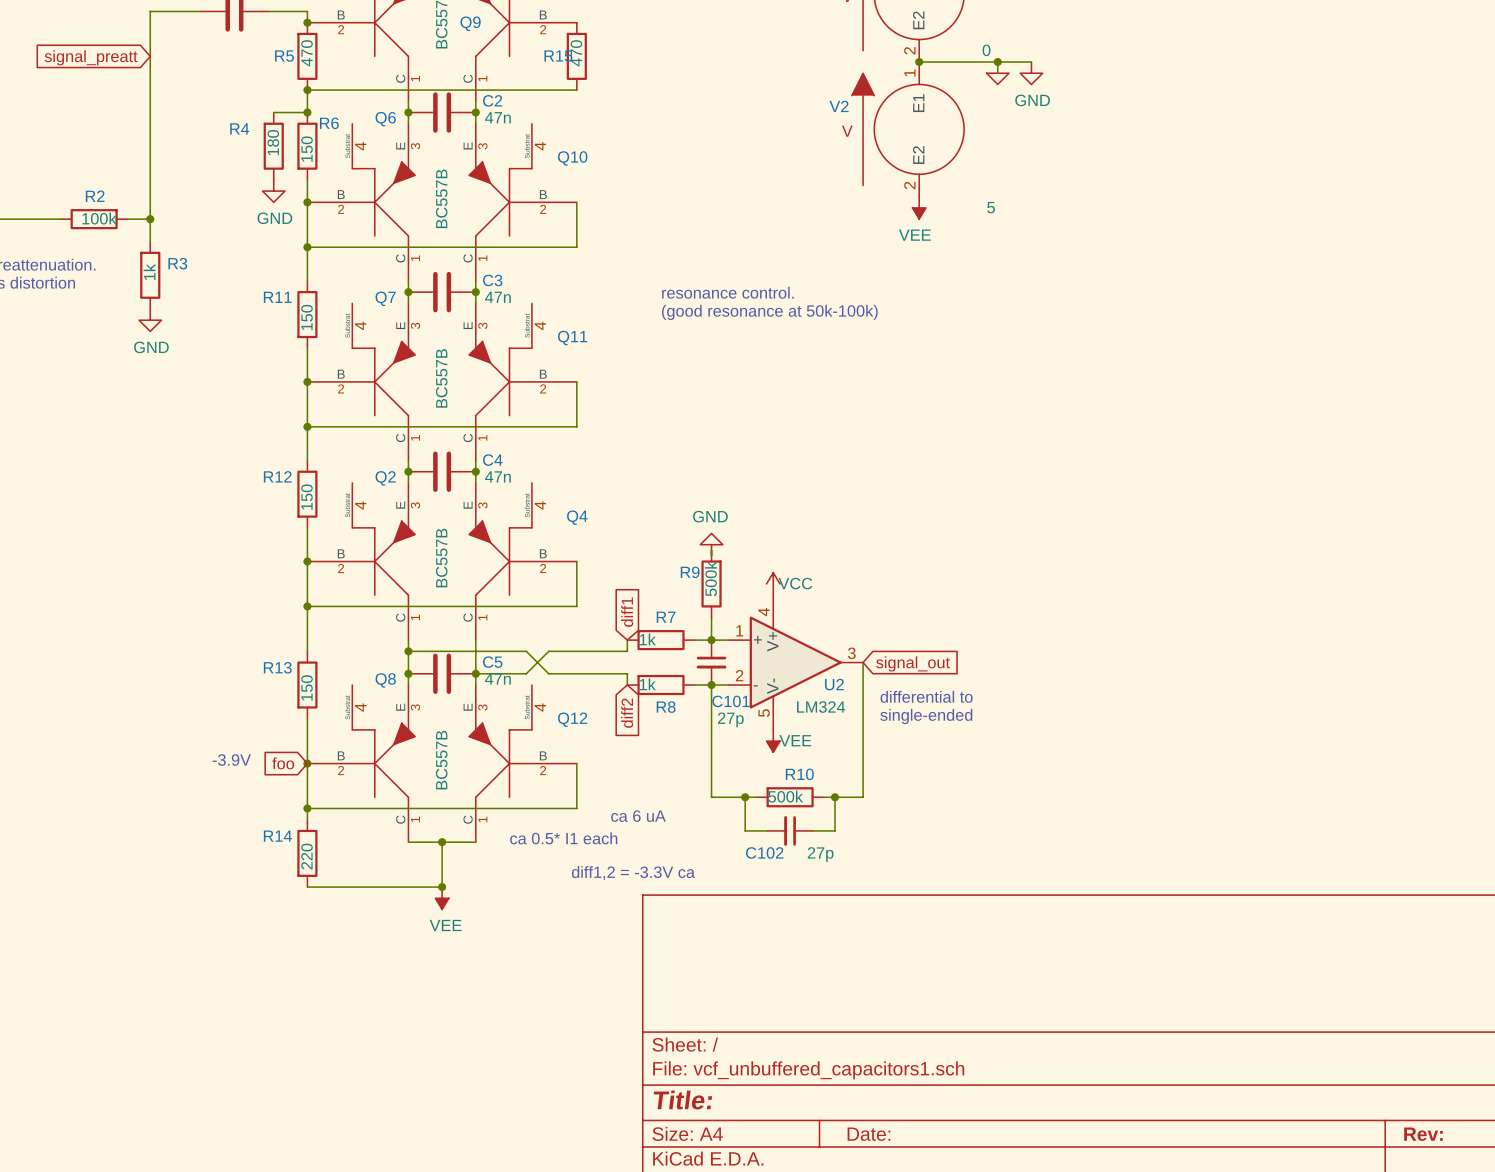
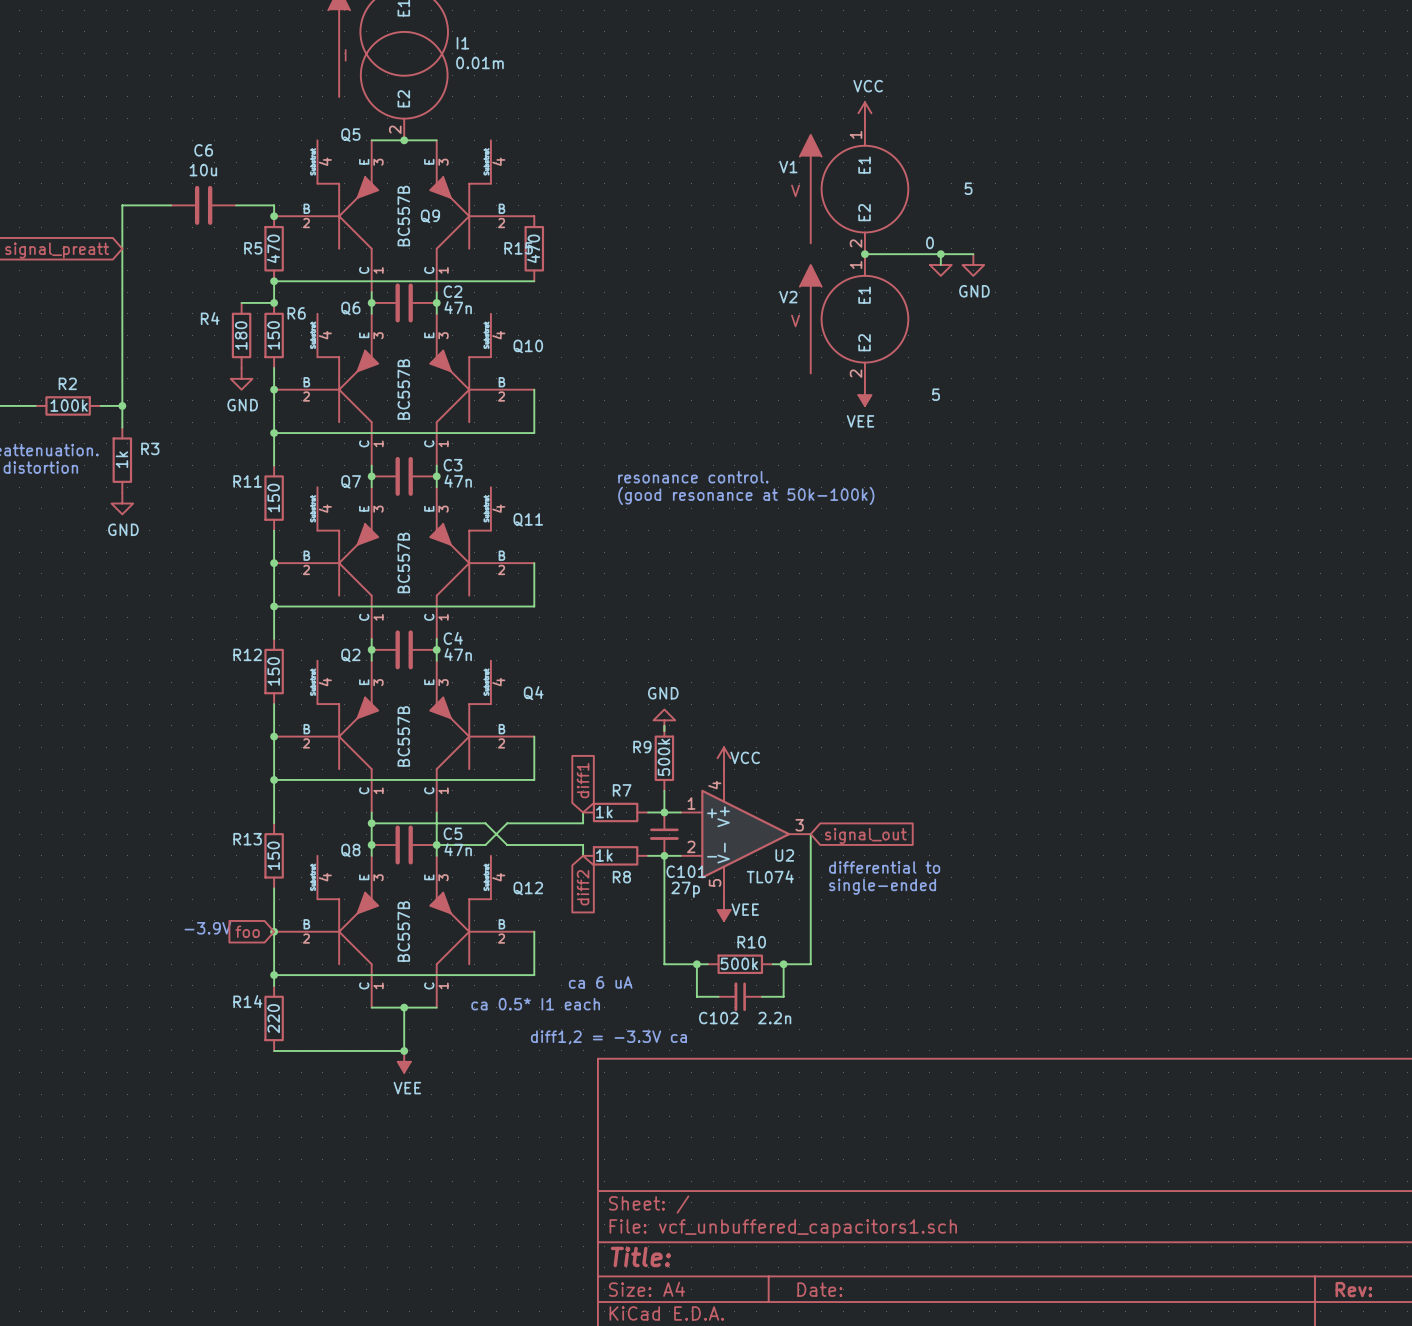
U2 value: LM324 (821, 707) -> TL074 (770, 876)
C102 value: 27p (820, 854) -> 2.2n (774, 1018)

